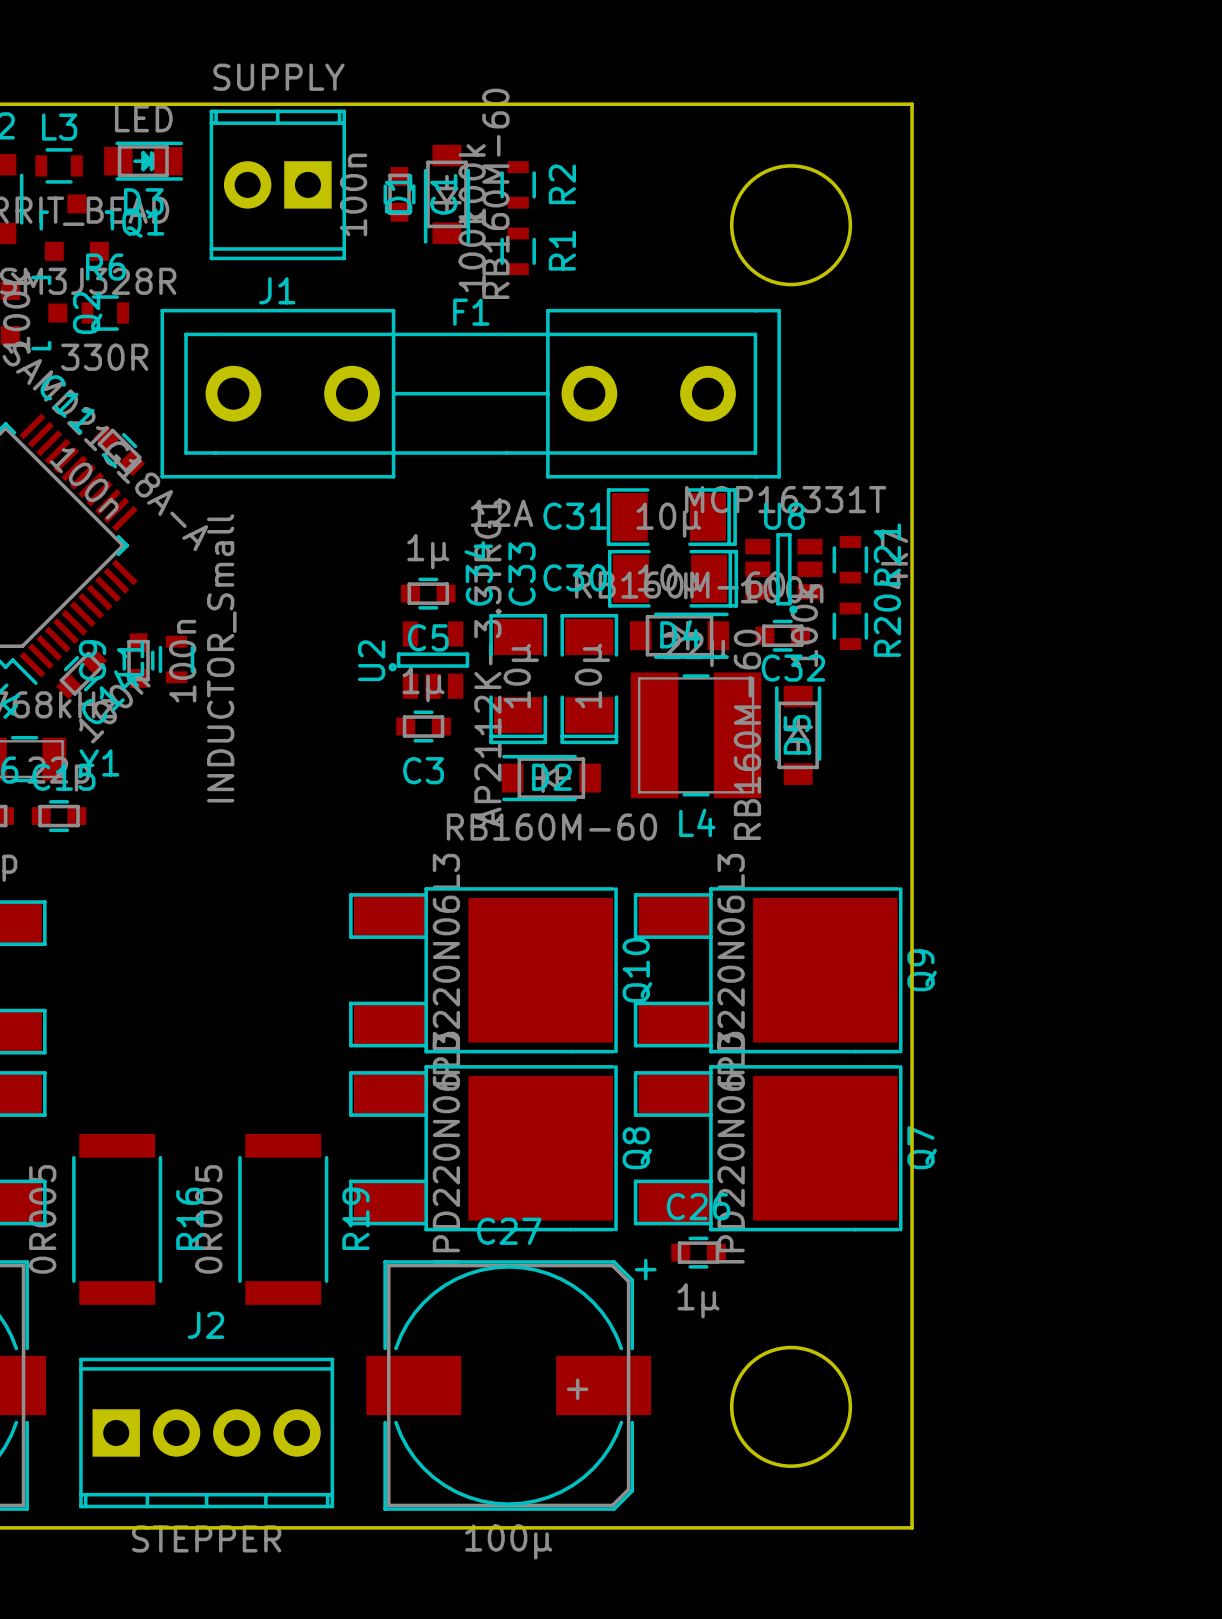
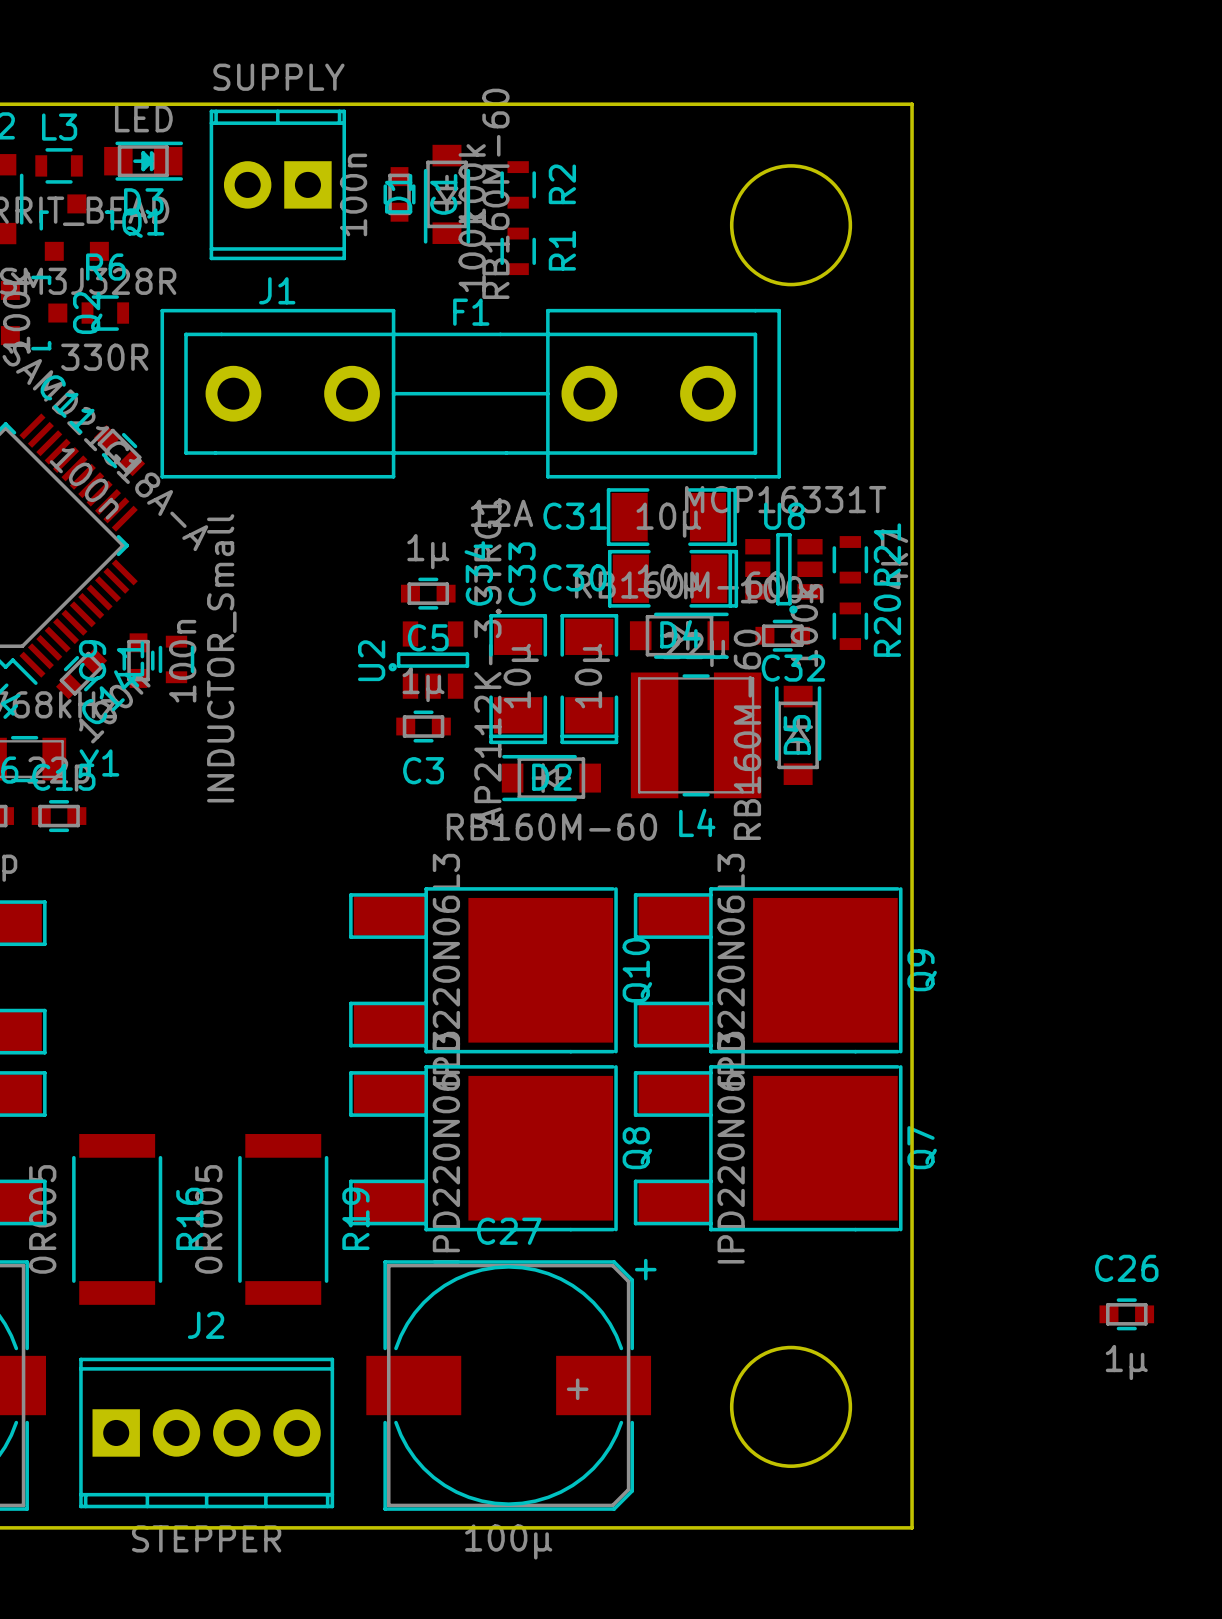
C26 position: (698, 1252) -> (1126, 1314)

